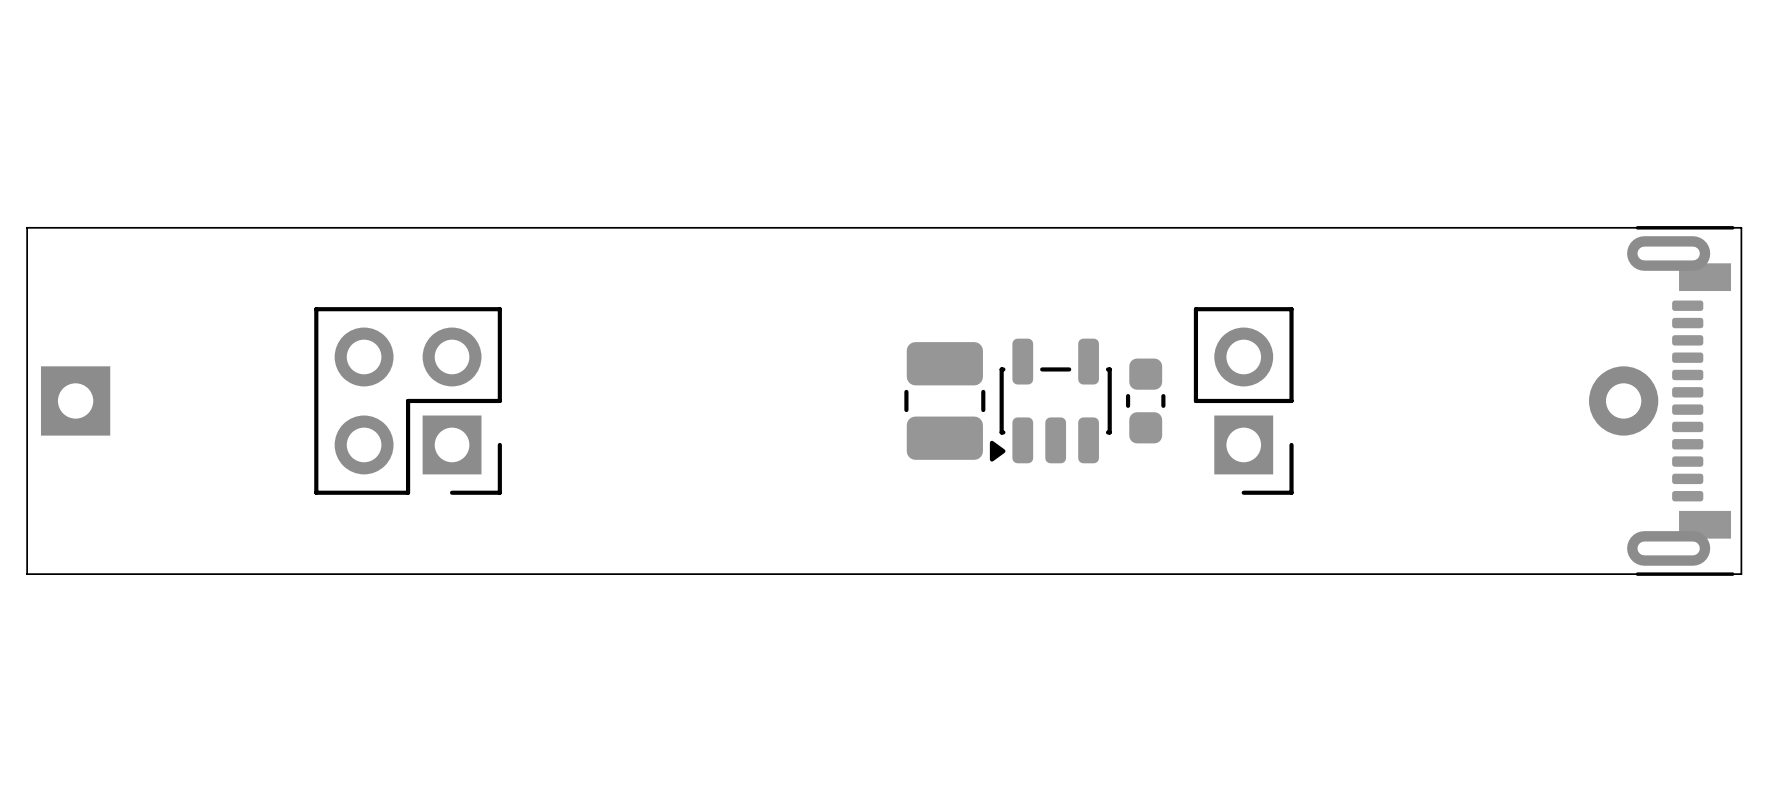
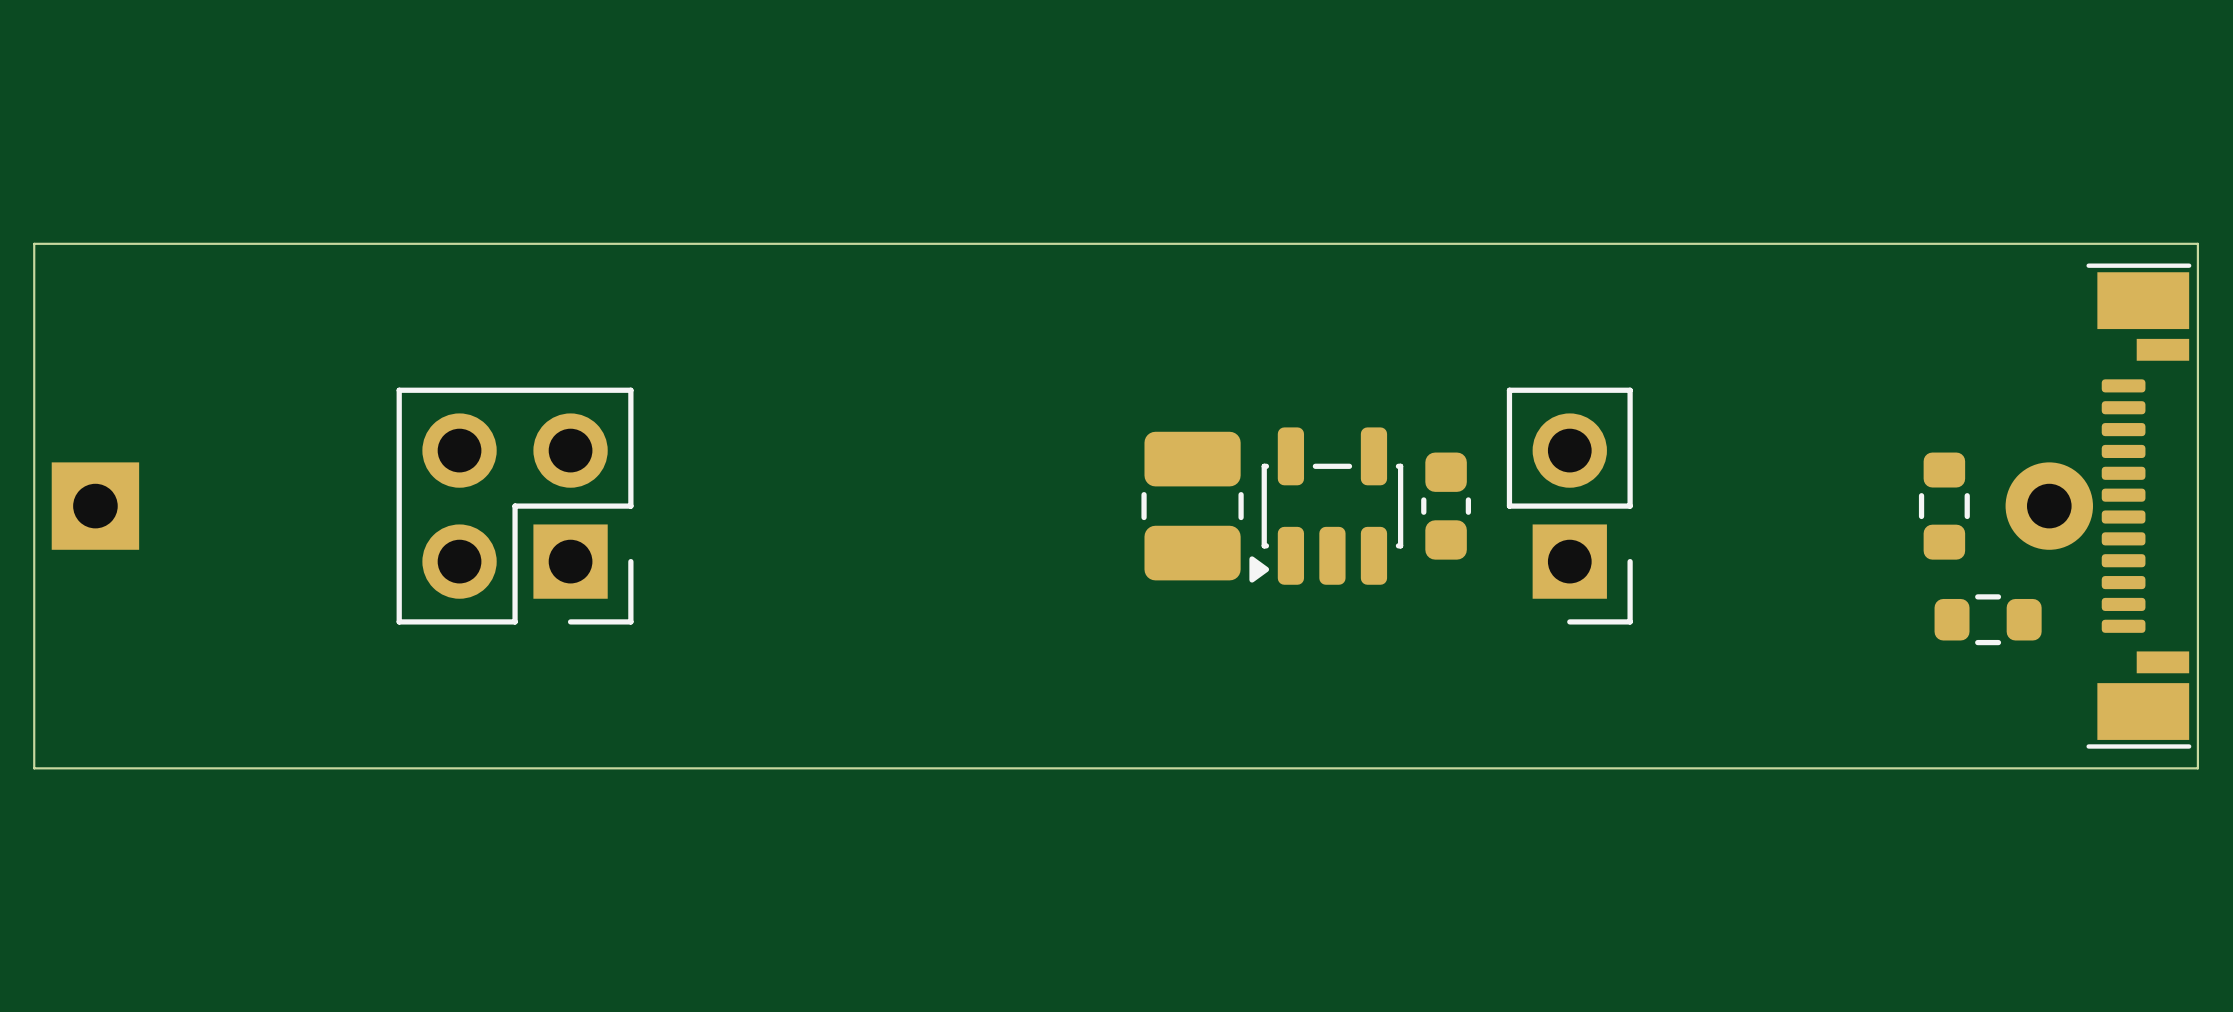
part footprint: [1627, 226, 1735, 576] -> [2086, 263, 2192, 749]
board edge: (27, 227) (1741, 227) -> (34, 287) (34, 243) (2197, 243) (2197, 287)
part: none -> (1944, 506)
part: none -> (1988, 619)
board edge: (27, 574) (1741, 574) -> (34, 724) (34, 768) (2197, 768) (2197, 724)

